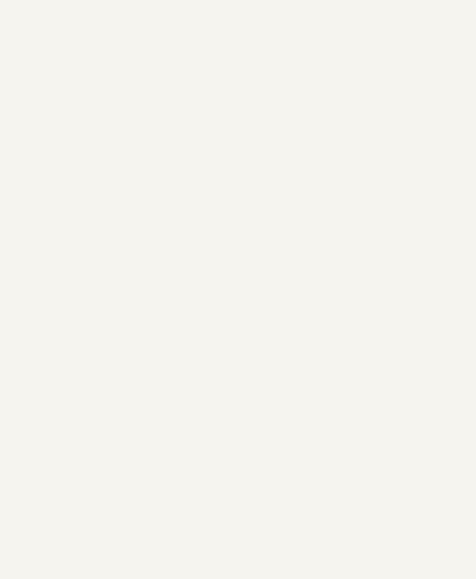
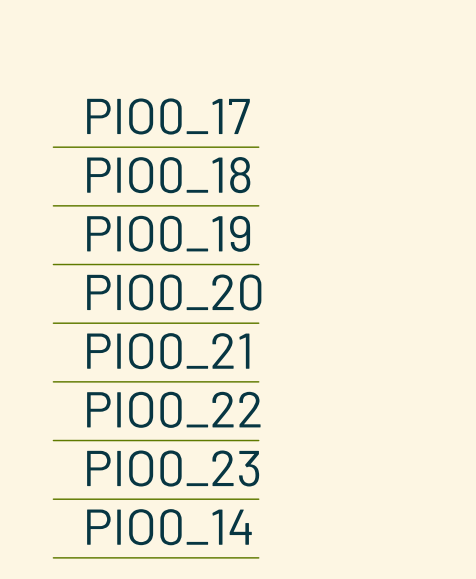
label: none -> PIO0_17 (168, 116)
wire: none -> (53, 147) (258, 147)
label: none -> PIO0_18 (168, 175)
wire: none -> (53, 205) (258, 205)
label: none -> PIO0_19 (168, 233)
wire: none -> (53, 264) (258, 264)
label: none -> PIO0_20 (174, 292)
wire: none -> (53, 323) (258, 323)
label: none -> PIO0_21 (168, 351)
wire: none -> (53, 381) (258, 381)
label: none -> PIO0_22 (173, 409)
wire: none -> (53, 440) (258, 440)
label: none -> PIO0_23 (173, 468)
wire: none -> (53, 499) (258, 499)
label: none -> PIO0_14 (169, 527)
wire: none -> (53, 557) (258, 557)

